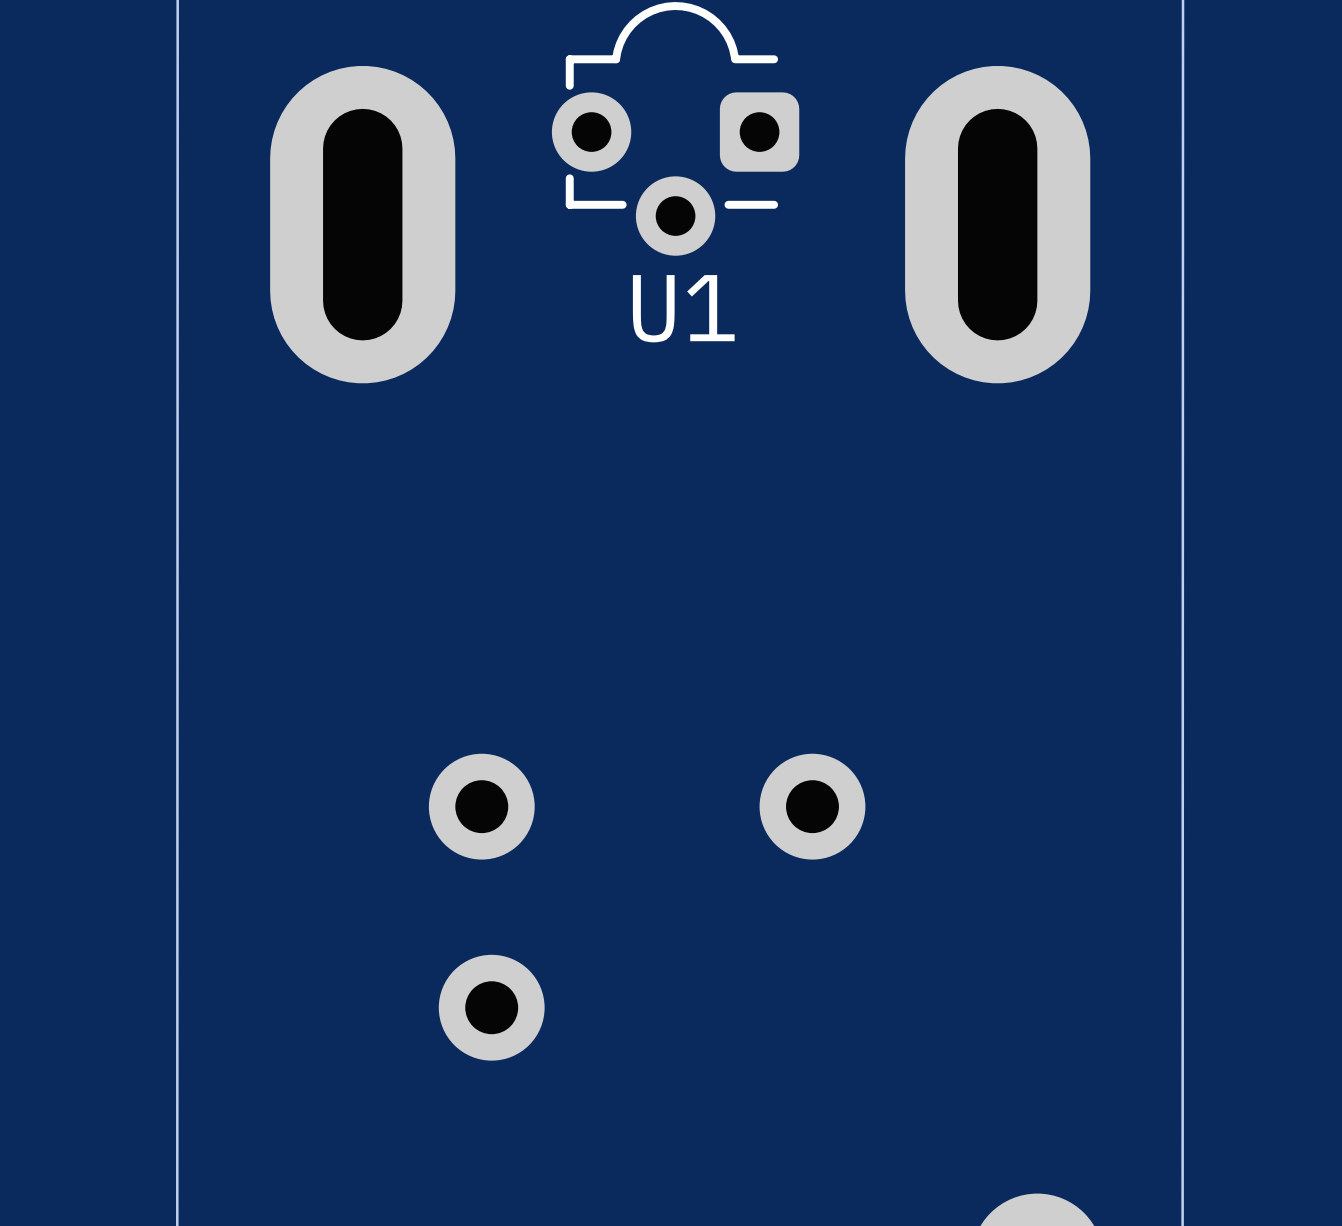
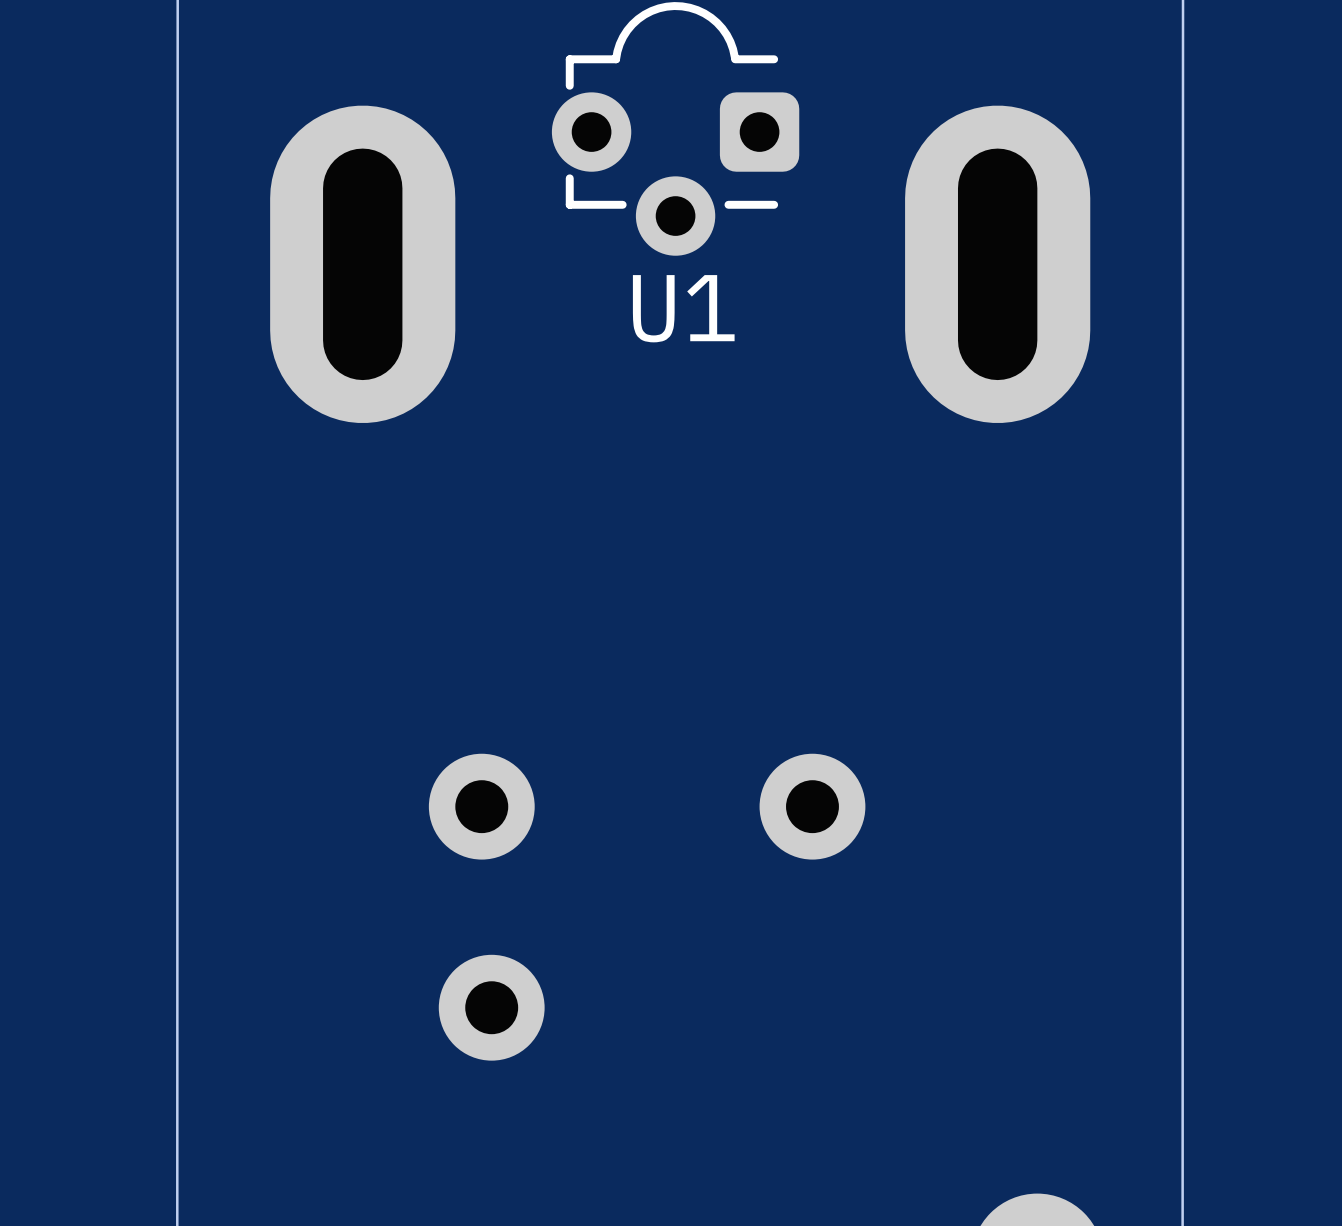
part position: (362, 224) -> (362, 264)
part position: (997, 224) -> (997, 264)

